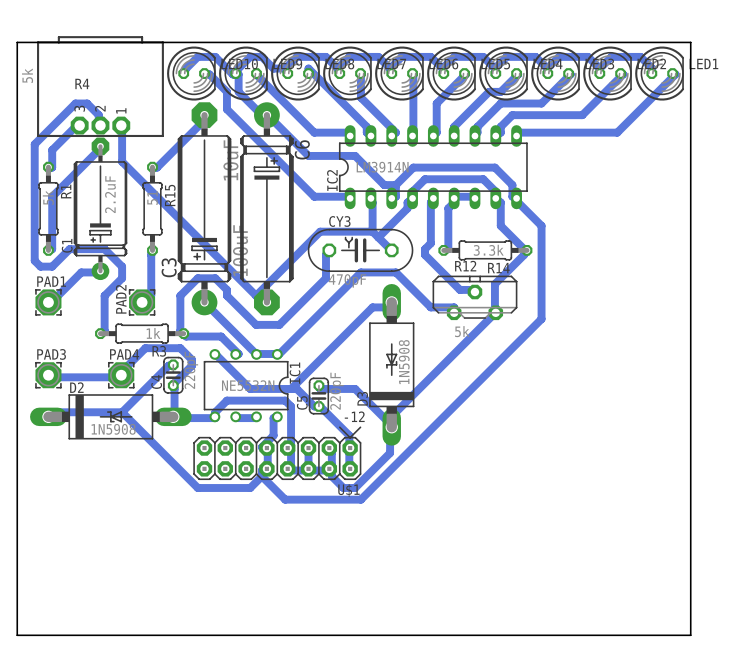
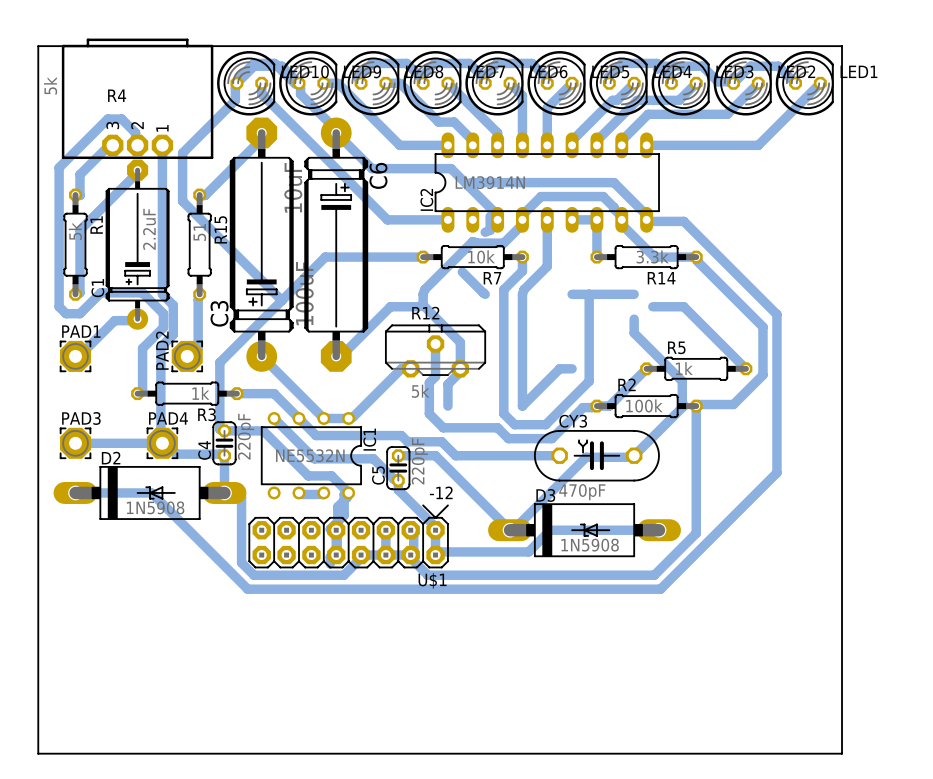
bottom track: (285, 68) (273, 68) (261, 56) (250, 56) (232, 74) (238, 74) (238, 91) (261, 115) (267, 115) (308, 155) (355, 155) (384, 185) (395, 185) (413, 167) (494, 167) (512, 185) (512, 196) (516, 198) (518, 202) (541, 225) (541, 319) (360, 499) (285, 499) (261, 476) (250, 488) (197, 488) (122, 412) -> none
bottom track: (442, 68) (454, 56) (483, 56) (494, 68) -> none
bottom track: (547, 68) (559, 56) (588, 56) (599, 68) (611, 56) (640, 56) (652, 68) (651, 73) -> (657, 69) (660, 66) (702, 66) (717, 81) (733, 83) (750, 66) (778, 66) (795, 83)
bottom track: (204, 73) (209, 74) (226, 91) (226, 109) (314, 196) (349, 196) (350, 198) -> (261, 83) (261, 94) (387, 219) (447, 219)
bottom track: (256, 73) (314, 132) (349, 132) (350, 135) -> (323, 83) (337, 83) (399, 145) (447, 145)
bottom track: (308, 73) (308, 68) (366, 126) (366, 132) (370, 135) -> (385, 83) (399, 83) (438, 122) (454, 122) (472, 140) (472, 145)
bottom track: (360, 73) (360, 97) (395, 132) (391, 135) -> (447, 83) (497, 132) (497, 145)
bottom track: (464, 73) (465, 74) (436, 103) (436, 132) (433, 135) -> (572, 83) (547, 108) (547, 145)
bottom track: (516, 73) (518, 74) (500, 91) (489, 91) (454, 126) (454, 135) -> (634, 83) (617, 100) (612, 100) (572, 140) (572, 145)
bottom track: (568, 73) (570, 74) (541, 103) (500, 103) (477, 126) (477, 132) (474, 135) -> (696, 83) (679, 100) (637, 100) (596, 140) (596, 145)
bottom track: (620, 73) (623, 74) (582, 115) (512, 115) (500, 126) (500, 132) (495, 135) -> (758, 83) (727, 114) (648, 114) (621, 140) (621, 145)
bottom track: (672, 73) (675, 74) (617, 132) (518, 132) (516, 135) -> (820, 83) (758, 145) (646, 145)
bottom track: (413, 74) (412, 135) -> (511, 84) (522, 95) (522, 145)
bottom track: (121, 125) (122, 161) (261, 301) (266, 302) (256, 295) (320, 231) (372, 231) (370, 198) -> (162, 145) (162, 294) (173, 305) (173, 334) (160, 347) (160, 441) (162, 443)
IC2 position: (433, 167) -> (547, 182)
bottom track: none -> (497, 219) (497, 215) (451, 168) (371, 168) (300, 94) (298, 83) (281, 66) (253, 66) (236, 83) (235, 100) (182, 153) (182, 201) (281, 300)
bottom track: none -> (547, 219) (547, 266) (524, 289) (522, 294) (522, 406) (559, 368) (572, 368)
bottom track: none -> (572, 219) (596, 219) (596, 257)
bottom track: (433, 198) (430, 202) (430, 243) (425, 249) (425, 254) (459, 289) (471, 289) (474, 292) -> none
bottom track: (474, 198) (454, 196) (454, 202) (448, 208) (448, 249) (443, 250) -> none
bottom track: none -> (423, 257) (325, 257) (219, 362) (219, 429) (263, 430) (308, 475) (331, 475) (348, 492) (347, 497) (337, 506) (336, 555)
R7: none -> 10k (472, 257)
bottom track: none -> (522, 257) (522, 271) (503, 289) (503, 413) (514, 424) (545, 424) (589, 381) (589, 294)
bottom track: (378, 237) (407, 208) (407, 202) (413, 196) (413, 190) (425, 179) (483, 179) (494, 190) (494, 196) (500, 202) (500, 225) (526, 250) (494, 284) (495, 312) (395, 412) (395, 423) (391, 427) -> none
bottom track: (329, 250) (326, 254) (326, 278) (279, 324) (256, 324) (226, 295) (226, 289) (215, 278) (197, 278) (180, 295) (180, 330) (186, 336) (221, 336) (238, 354) (235, 354) -> none
CY3 position: (360, 250) -> (596, 455)
bottom track: none -> (572, 294) (634, 294)
R14 position: (485, 250) -> (646, 257)
bottom track: none -> (423, 305) (424, 289) (472, 241) (503, 243) (522, 224) (522, 215) (541, 196) (603, 196) (620, 215) (621, 224) (654, 257) (696, 257) (697, 261) (762, 326) (762, 375) (733, 404) (696, 406) (696, 533) (654, 575) (427, 575) (412, 559) (410, 555) (361, 555) (359, 559) (343, 575) (253, 575) (241, 562) (241, 497) (224, 492) (224, 455) (176, 454) (167, 444) (162, 443)
bottom track: none -> (423, 305) (460, 342) (460, 368) (458, 373) (447, 384) (447, 406)
bottom track: none -> (423, 305) (390, 306) (340, 356) (336, 356)
bottom track: none -> (652, 306) (683, 306) (745, 368)
bottom track: none -> (435, 343) (435, 376) (429, 382) (429, 413) (443, 427) (497, 427) (508, 438) (551, 438) (582, 407) (609, 406) (646, 368)
R12 position: (474, 297) -> (435, 351)
bottom track: (391, 302) (390, 307) (372, 307) (291, 388) -> none
bottom track: none -> (410, 368) (401, 368) (353, 416) (323, 418)
bottom track: (454, 312) (454, 307) (430, 307) (395, 272) (360, 272) (279, 354) (256, 354) -> none
R5: none -> 1k (696, 368)
bottom track: none -> (236, 393) (274, 393) (316, 435) (401, 435) (407, 441) (441, 441) (455, 455) (559, 455)
R2: none -> 100k (646, 406)
bottom track: (214, 354) (250, 388) (296, 388) (314, 406) (320, 406) (349, 435) (350, 468) -> (274, 418) (314, 458) (373, 458) (393, 479) (398, 480) (398, 489) (435, 527) (435, 555) (440, 551) (528, 551) (550, 530) (659, 530)
bottom track: (173, 364) (168, 365) (122, 412) -> none
D3 rotation: 0° (391, 364) -> 90° clockwise (584, 530)
D3 position: (391, 364) -> (584, 530)
bottom track: (48, 375) (52, 377) (116, 377) (121, 375) (122, 371) (145, 348) (180, 348) (192, 359) (192, 365) (173, 385) (174, 418) (215, 418) (215, 412) (226, 400) (285, 400) (291, 406) (291, 447) (287, 448) (291, 453) (291, 464) (287, 468) (291, 470) (326, 470) (329, 468) (331, 470) (331, 476) (343, 488) (355, 488) (390, 453) (390, 429) (391, 427) -> (75, 443) (162, 443)
bottom track: (318, 385) (320, 388) (355, 388) (391, 427) -> (398, 455) (435, 455) (510, 530) (514, 528) (586, 457) (634, 455) (683, 406) (682, 381) (634, 333) (634, 319)
bottom track: (122, 412) (52, 412) (48, 416) -> (468, 185) (471, 182) (614, 182) (646, 215) (646, 219) (683, 221) (776, 314) (776, 472) (660, 589) (247, 589) (151, 492) (75, 492)

